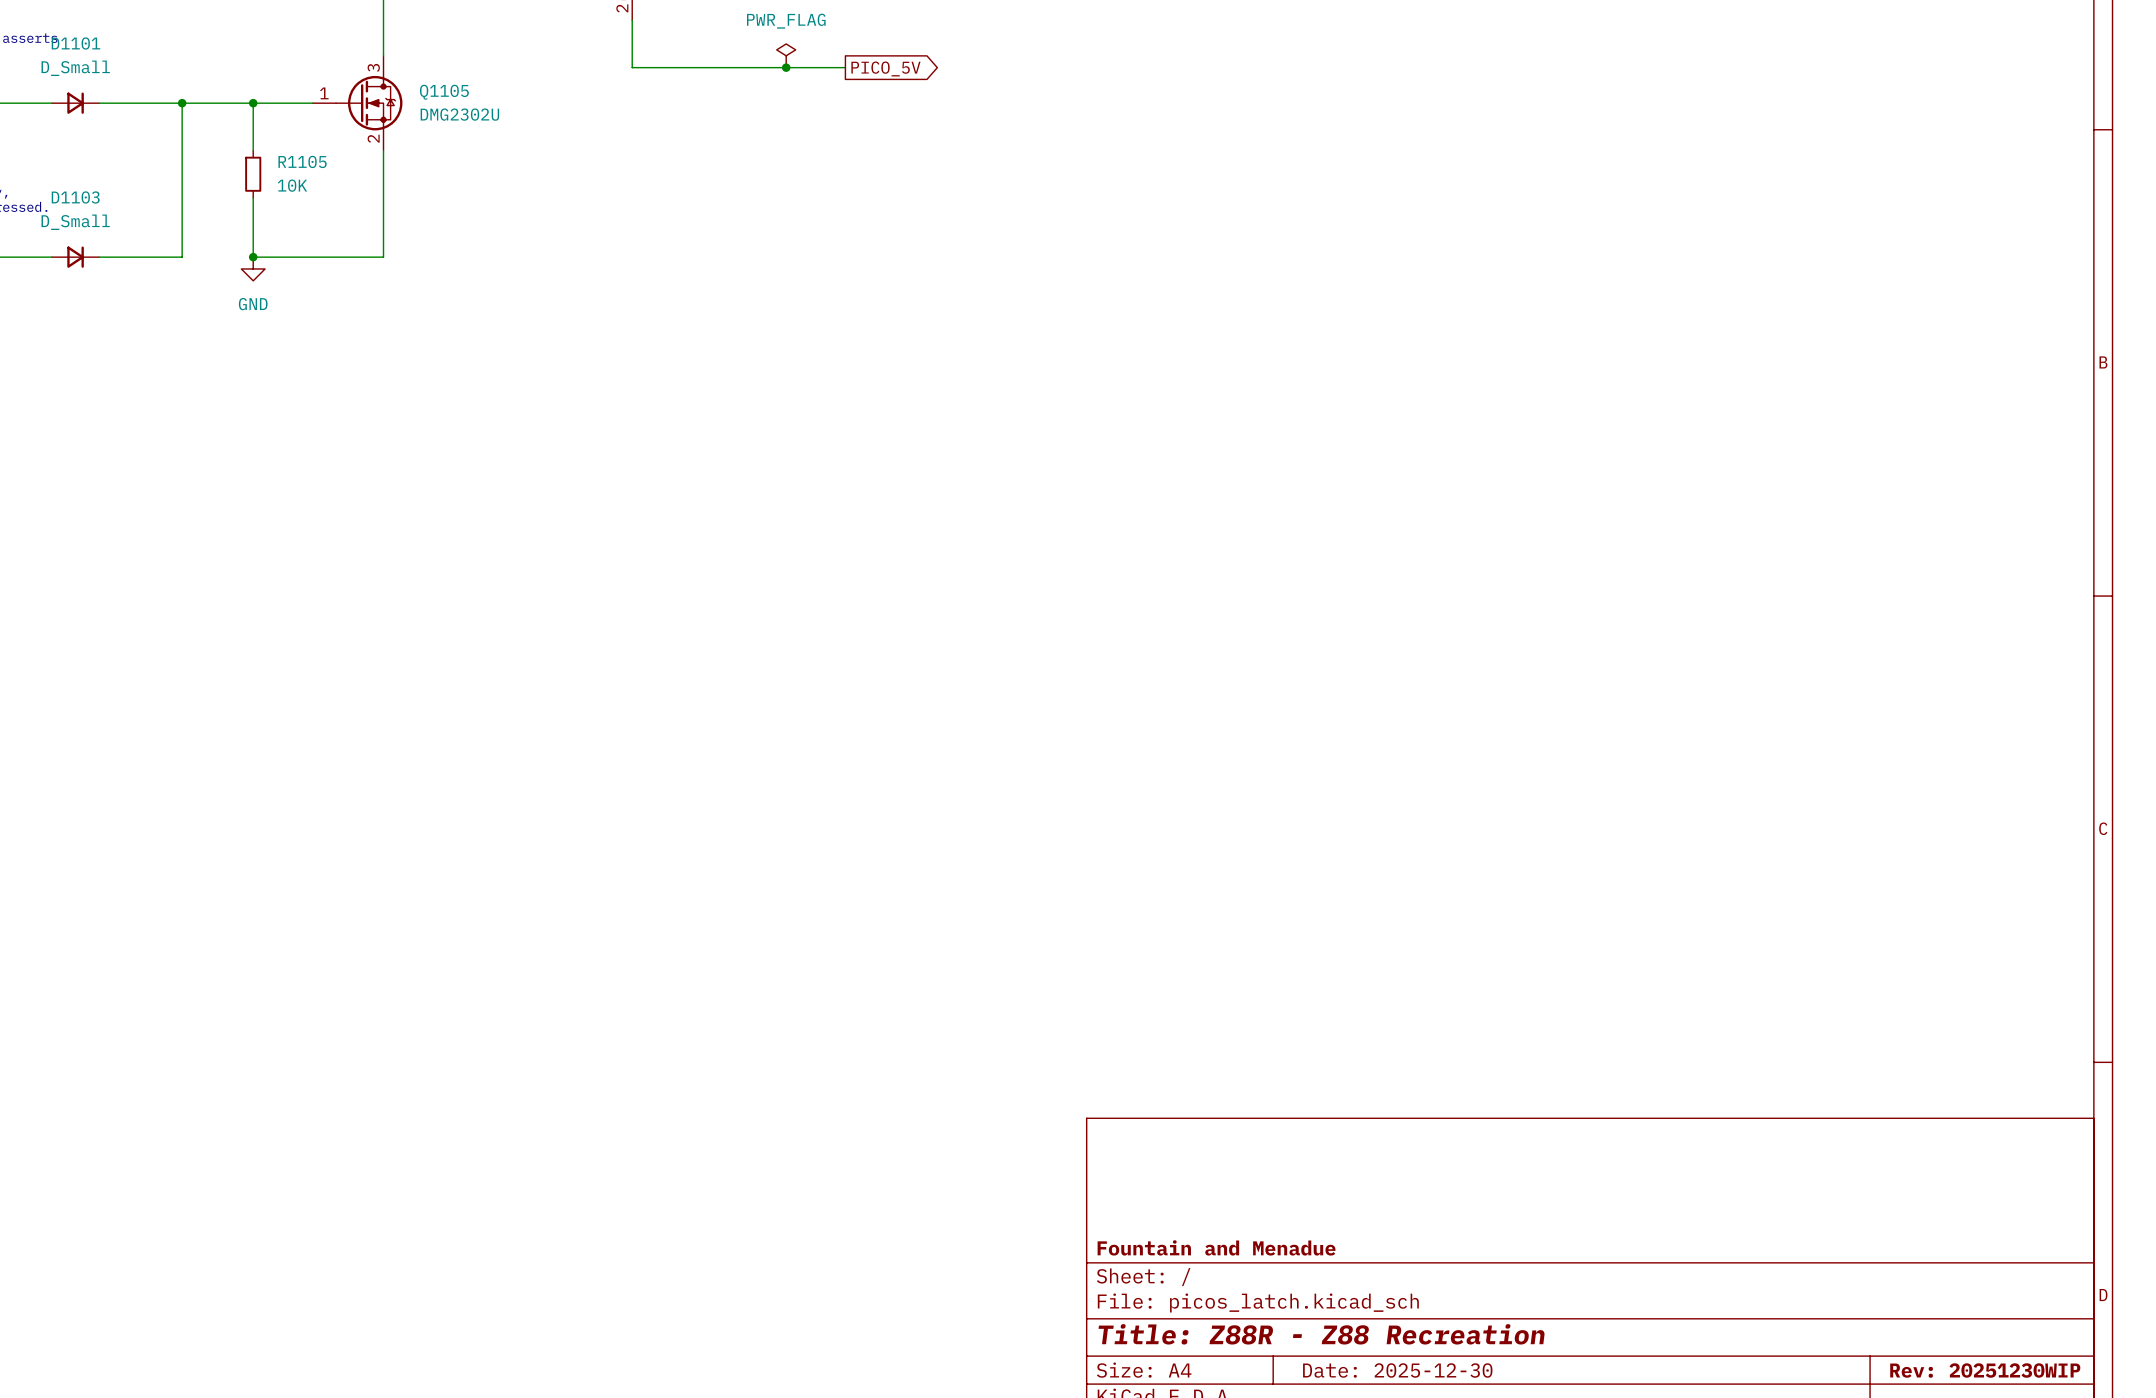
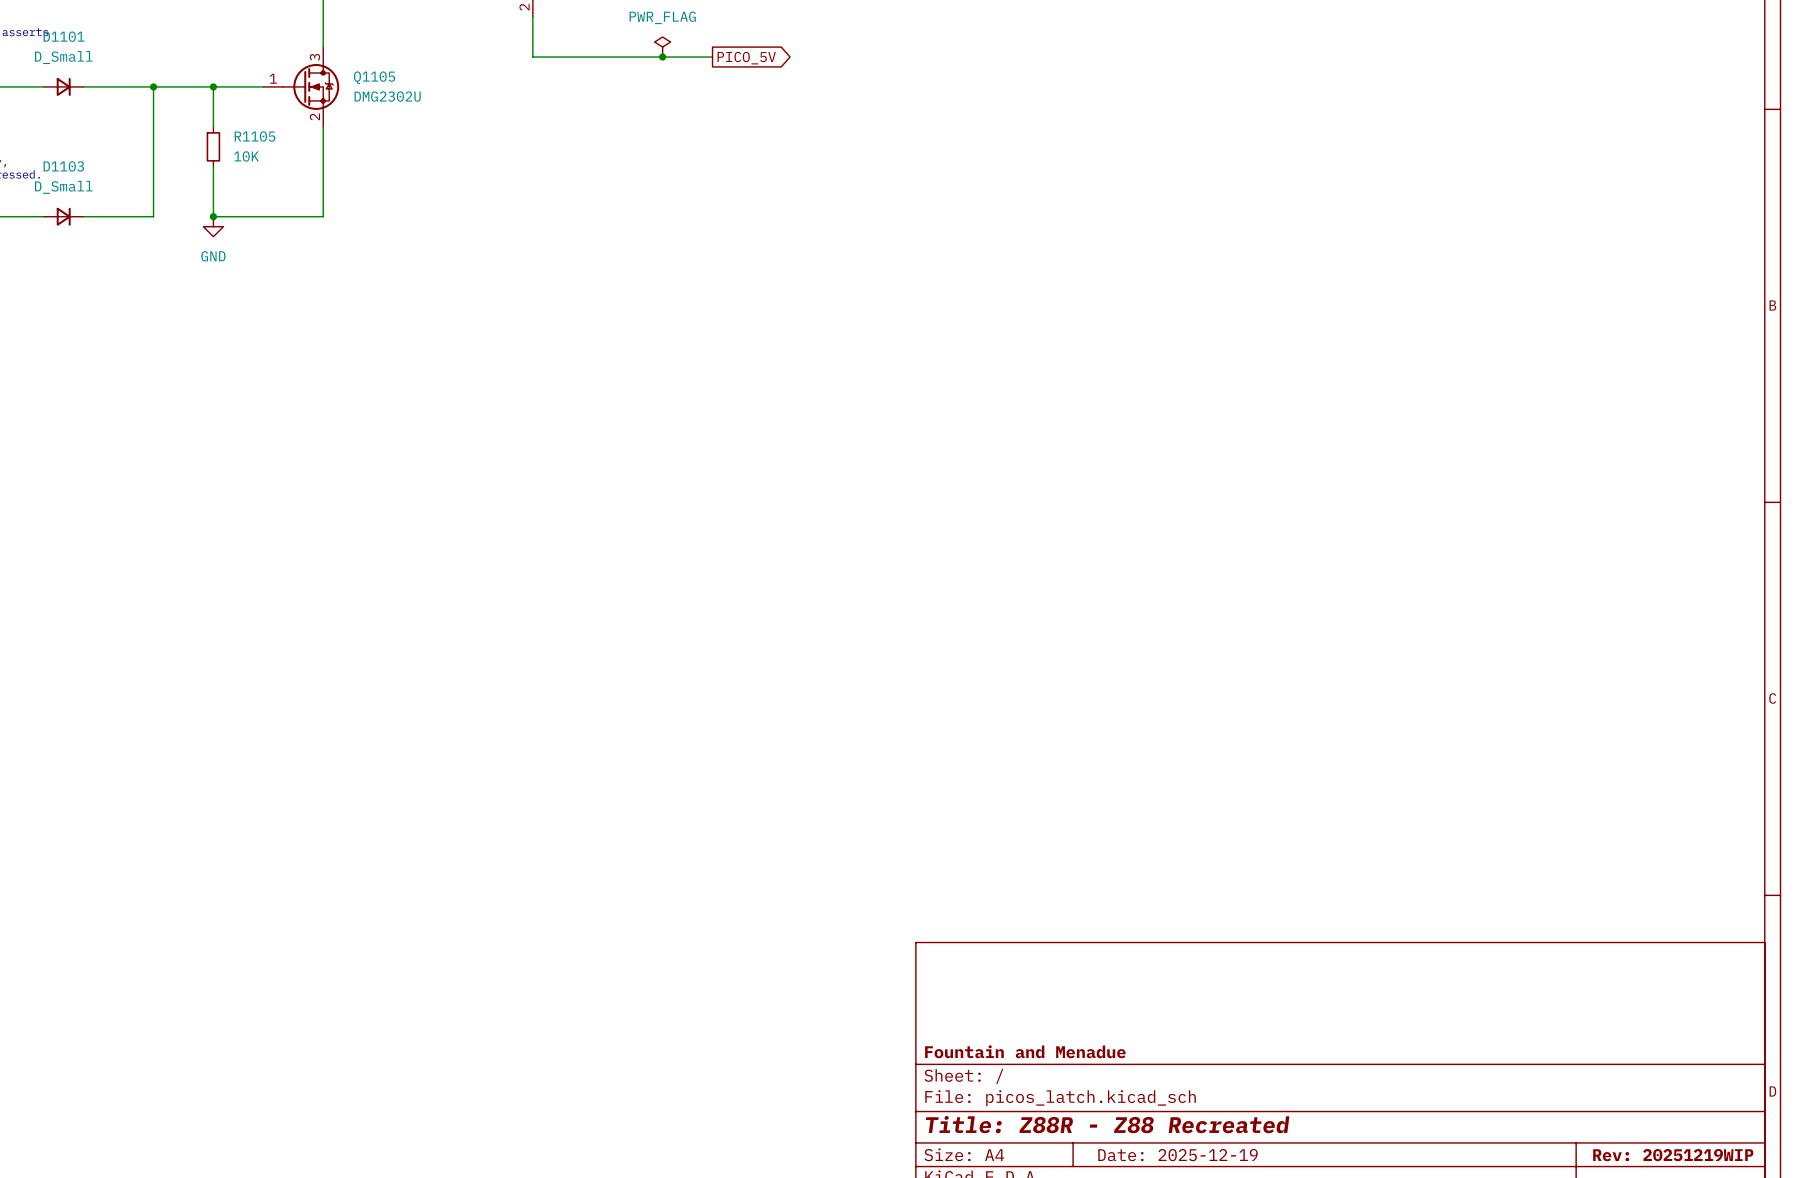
title block: Title: Z88R - Z88 Recreation (1321, 1334) -> Title: Z88R - Z88 Recreated (1107, 1124)
title block: Date: 2025-12-30 (1397, 1370) -> Date: 2025-12-19 (1178, 1155)
title block: Rev: 20251230WIP (1985, 1370) -> Rev: 20251219WIP (1673, 1155)

